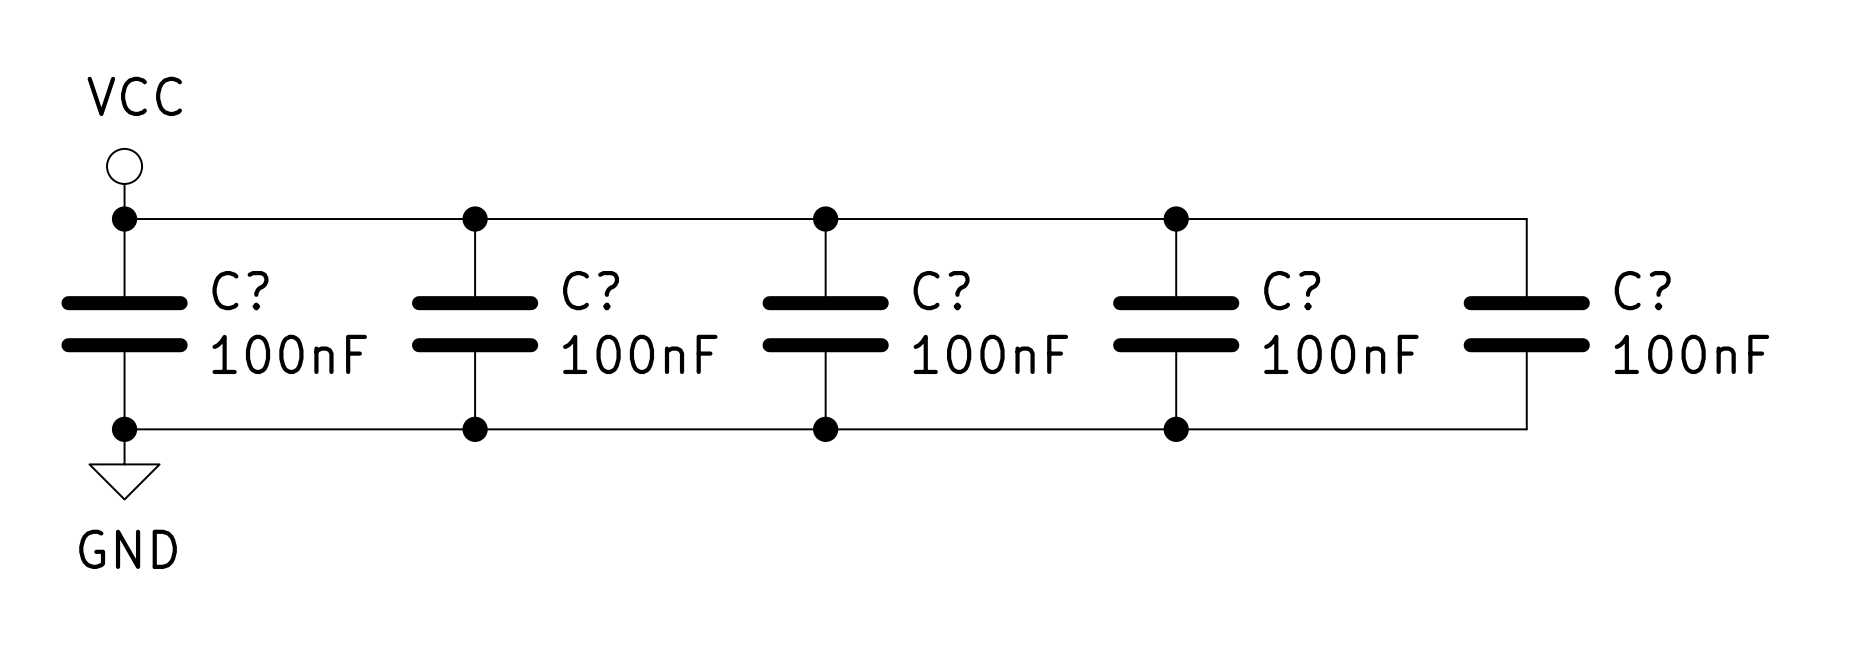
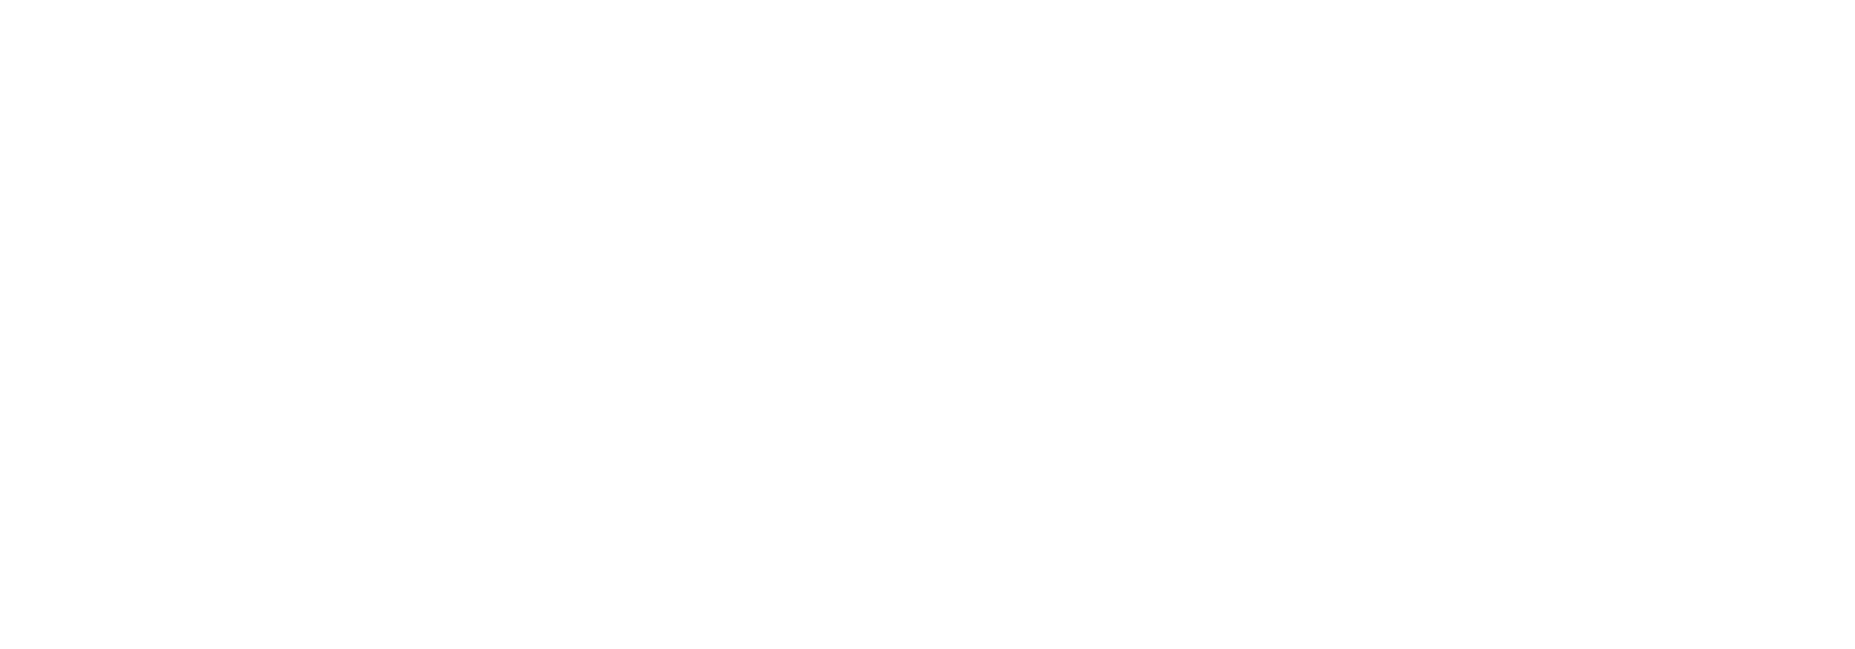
power symbol: VCC (124, 183) -> none
wire: (124, 219) (1526, 219) -> none
junction: (124, 219) -> none
junction: (475, 219) -> none
junction: (825, 219) -> none
junction: (1176, 219) -> none
C?: 100nF (124, 324) -> none
C?: 100nF (475, 324) -> none
C?: 100nF (825, 324) -> none
C?: 100nF (1176, 324) -> none
C?: 100nF (1526, 324) -> none
wire: (124, 429) (1526, 429) -> none
junction: (124, 429) -> none
junction: (475, 429) -> none
junction: (825, 429) -> none
junction: (1176, 429) -> none
power symbol: GND (124, 464) -> none

